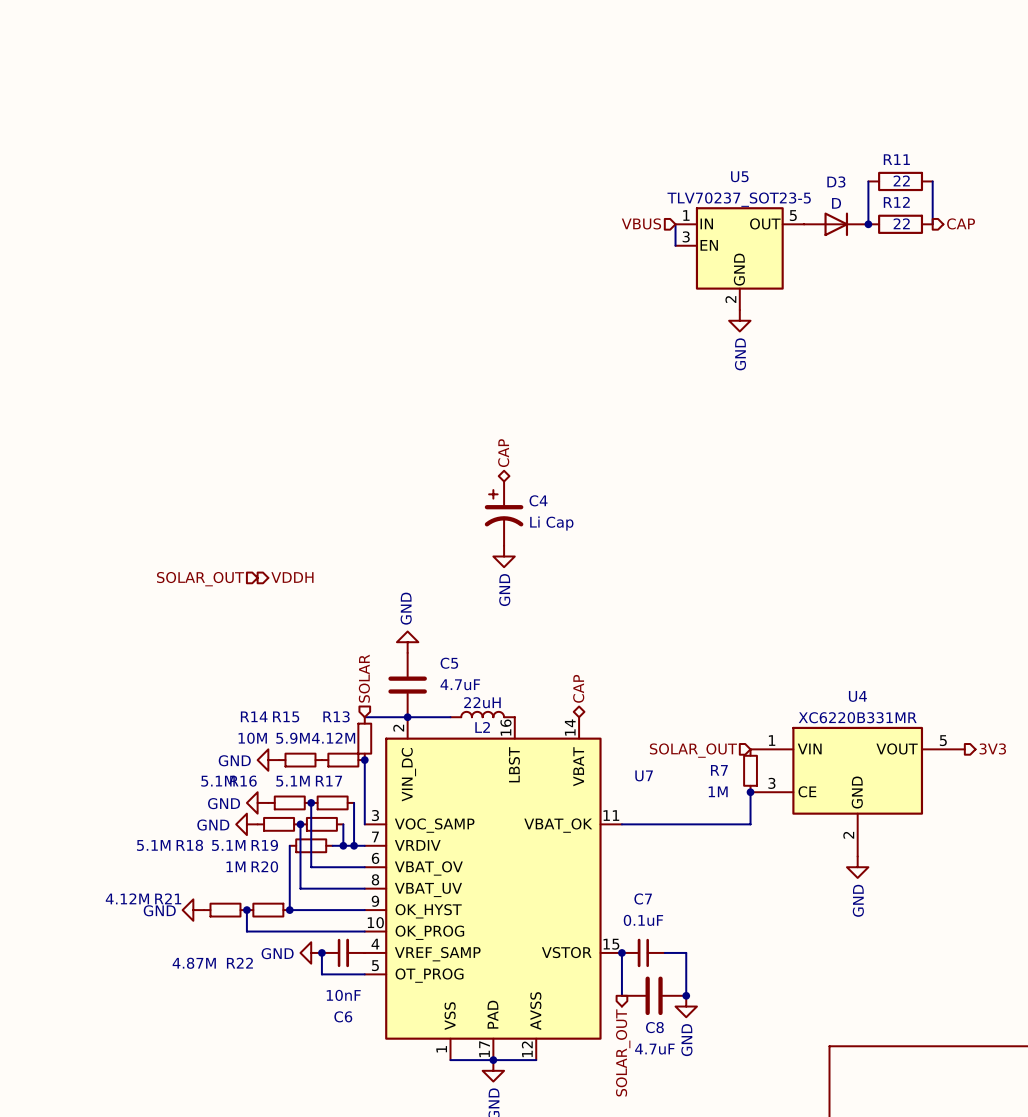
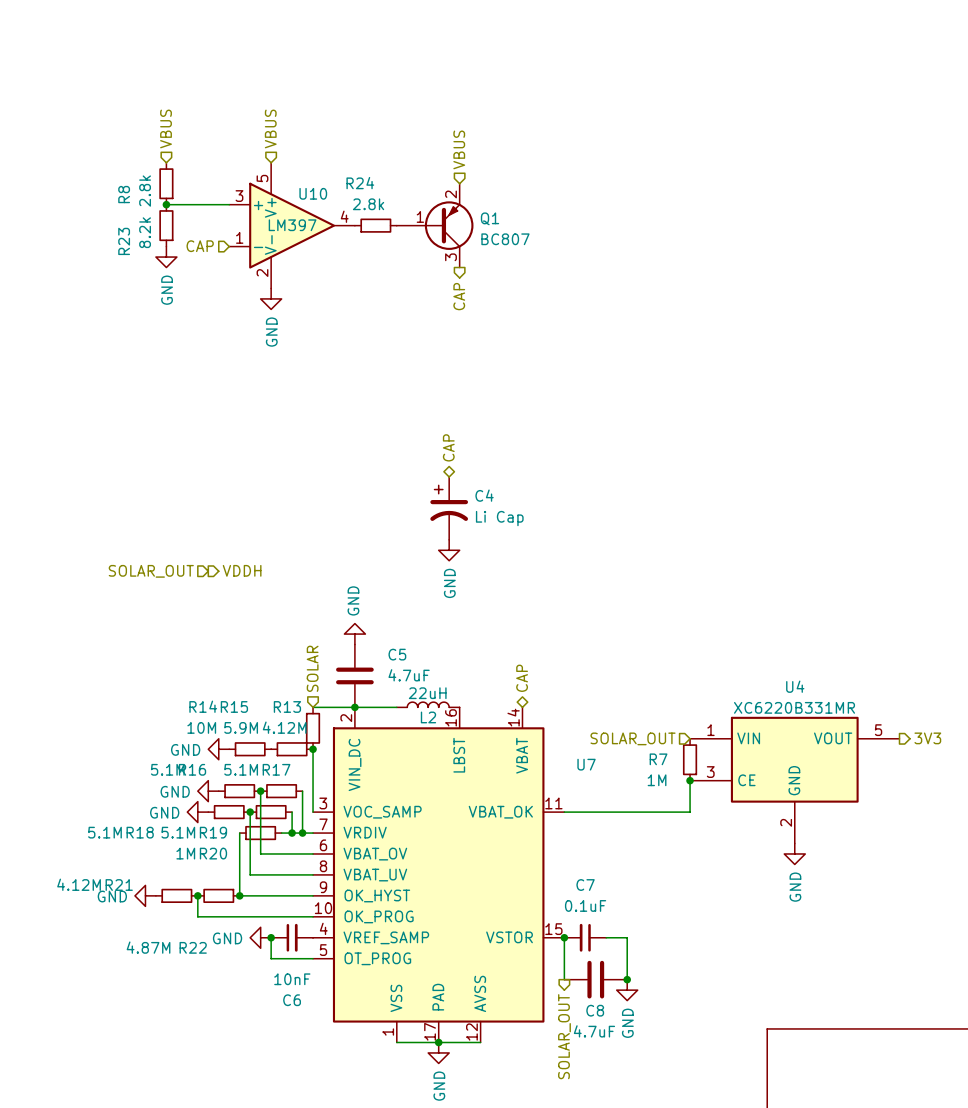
hierarchical label: none -> VBUS (166, 128)
hierarchical label: none -> VBUS (270, 128)
R8: none -> 2.8k (166, 183)
wire: (868, 181) (868, 224) -> none
R11: 22 (900, 181) -> none
wire: (932, 181) (932, 224) -> none
wire: none -> (166, 204) (229, 204)
junction: none -> (166, 204)
hierarchical label rotation: 0° (641, 223) -> 90° clockwise (459, 149)
hierarchical label position: VBUS (641, 223) -> VBUS (459, 149)
hierarchical label: CAP (961, 223) -> none
R23: none -> 8.2k (166, 225)
U10: none -> LM397 (292, 225)
R24: none -> 2.8k (375, 225)
Q1: none -> BC807 (435, 225)
wire: (675, 224) (675, 245) -> none
D3: D (836, 224) -> none
junction: (868, 224) -> none
R12: 22 (900, 224) -> none
hierarchical label: none -> CAP (200, 246)
power symbol: none -> GND (166, 257)
U5: TLV70237_SOT23-5 (739, 258) -> none
hierarchical label: none -> CAP (459, 296)
power symbol: none -> GND (271, 298)
power symbol: GND (739, 320) -> none

